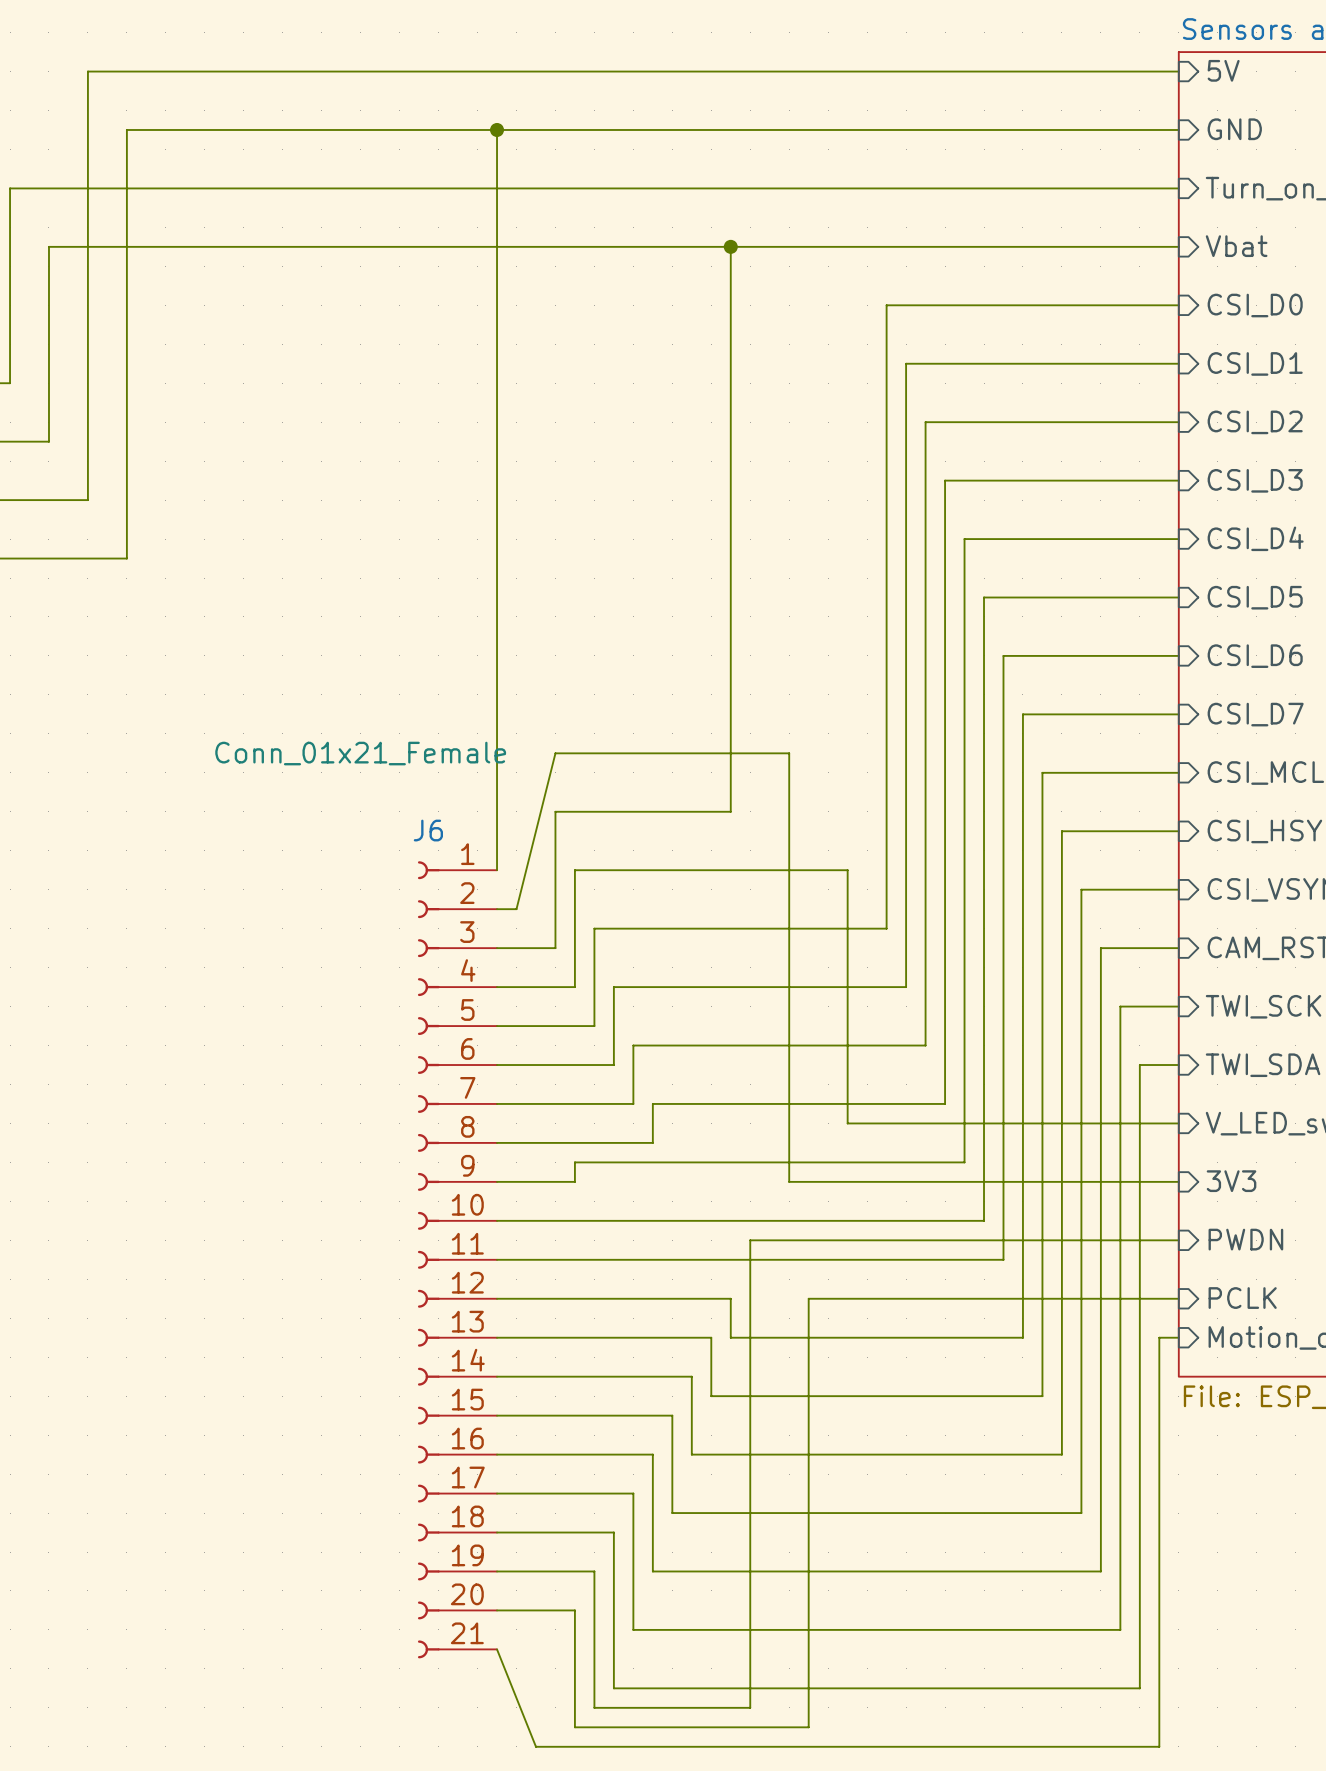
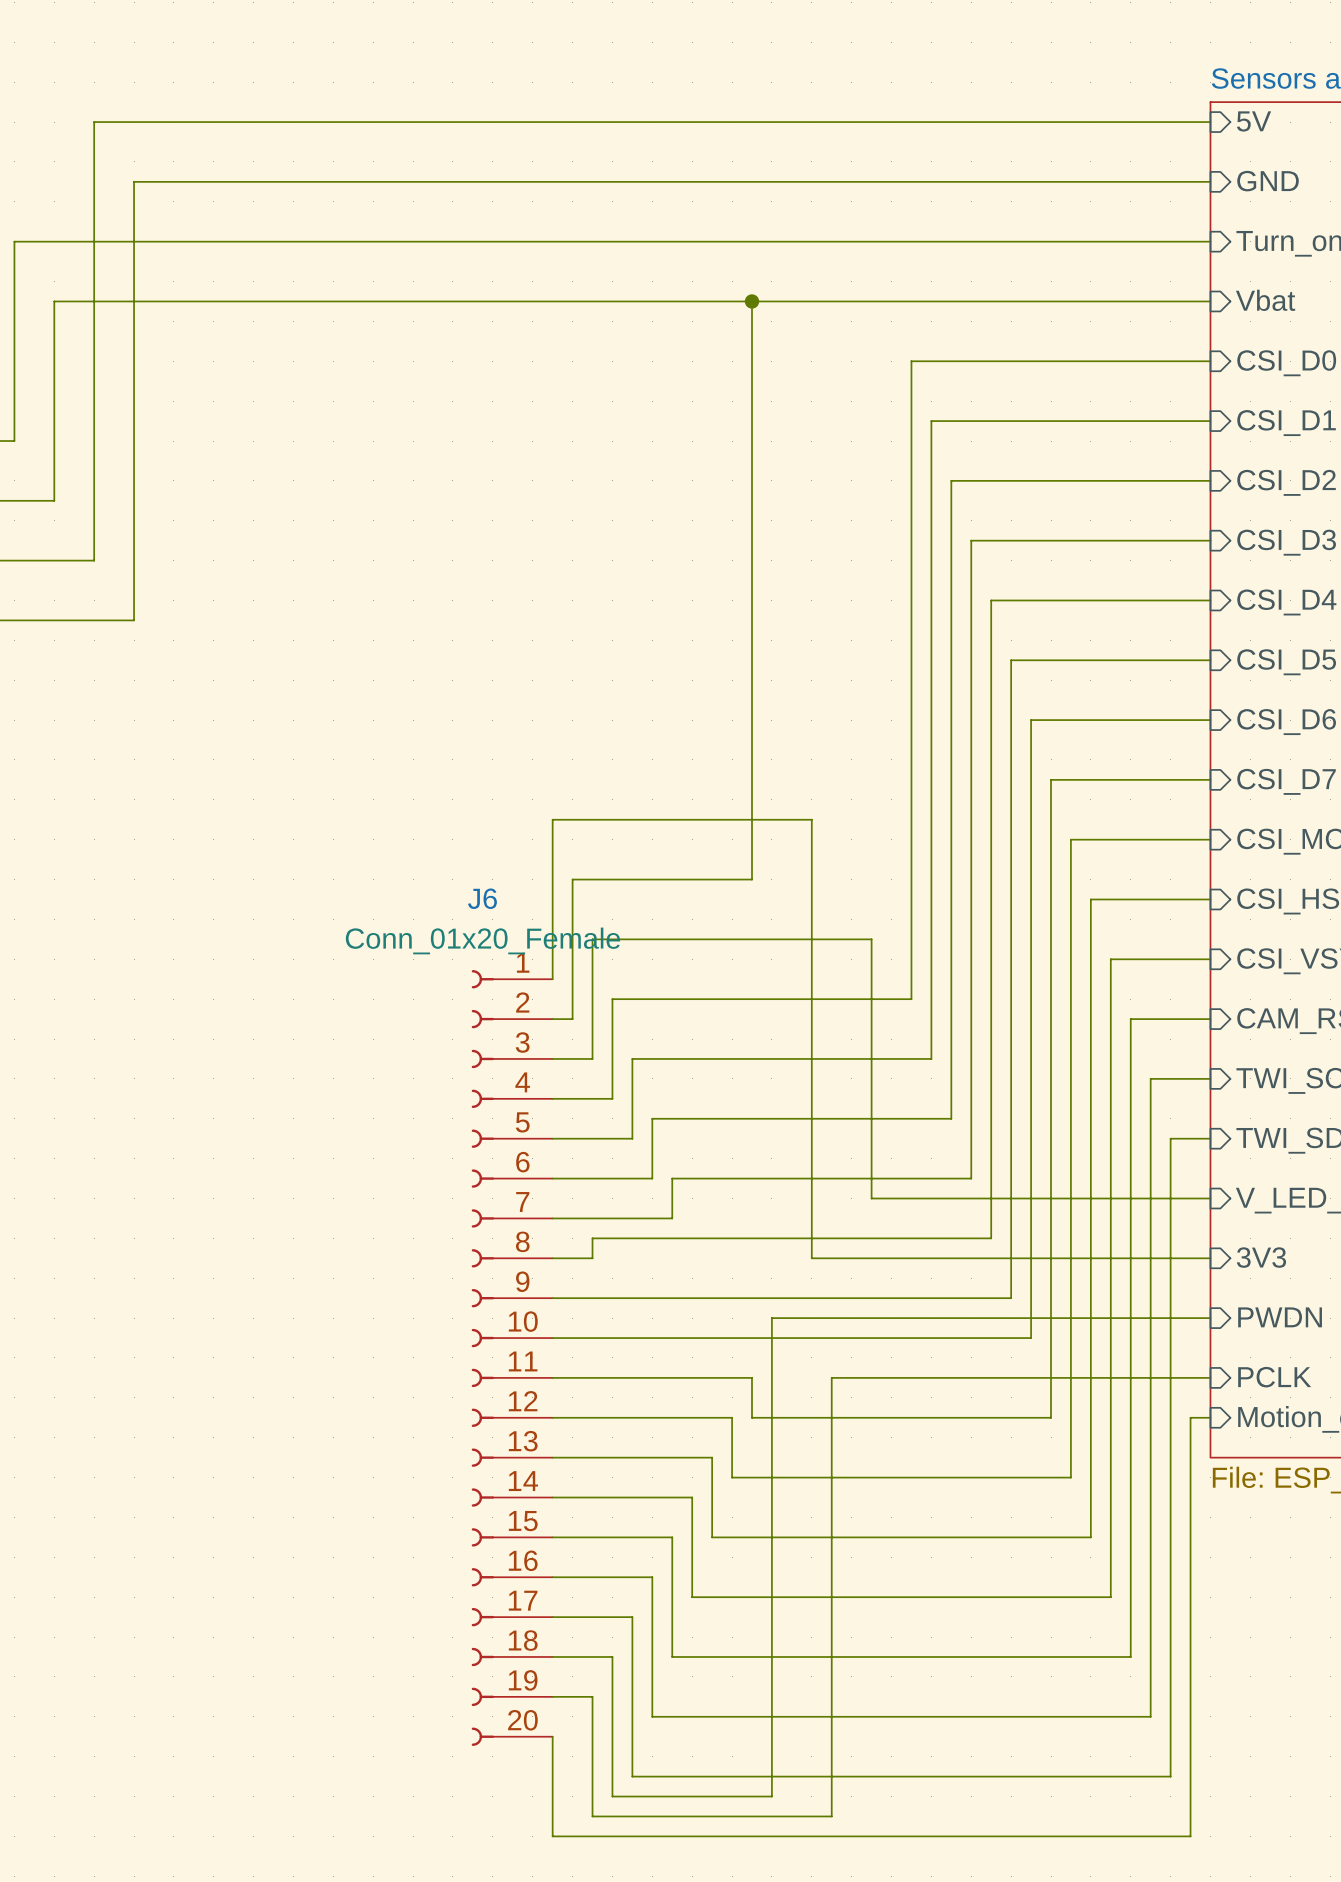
wire: (497, 129) (497, 870) -> none
junction: (497, 129) -> none
J6 value: Conn_01x21_Female (360, 753) -> Conn_01x20_Female (482, 940)
wire: (555, 753) (516, 909) (497, 909) -> (572, 819) (552, 819) (552, 979)
J6 symbol: [417, 861, 498, 1659] -> [471, 970, 553, 1746]
wire: (497, 1649) (535, 1746) -> (552, 1736) (552, 1836)

